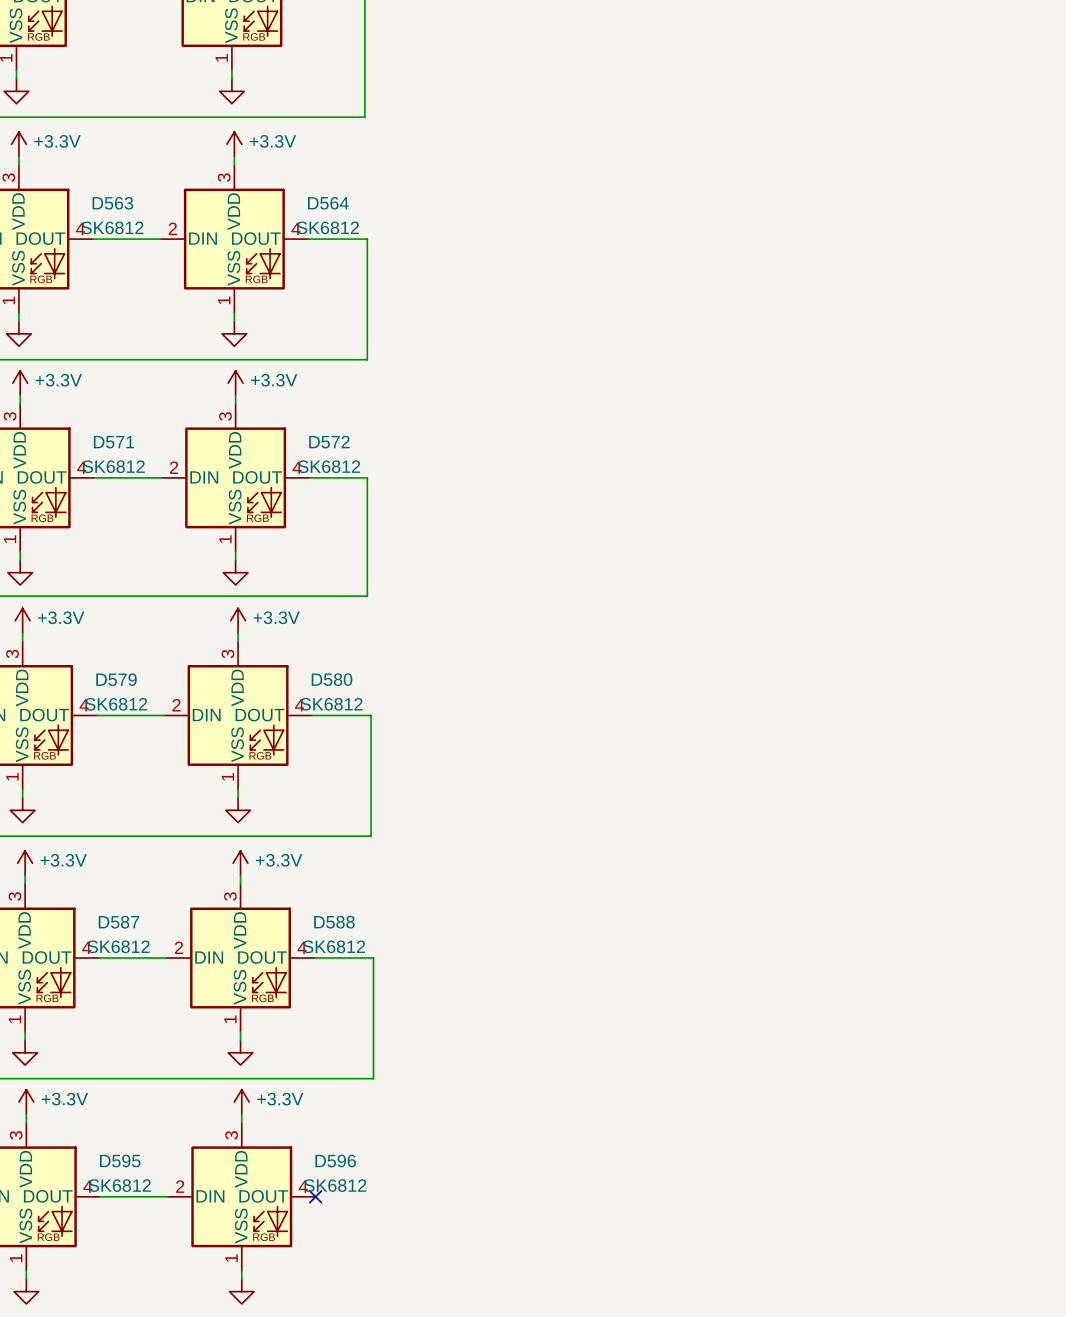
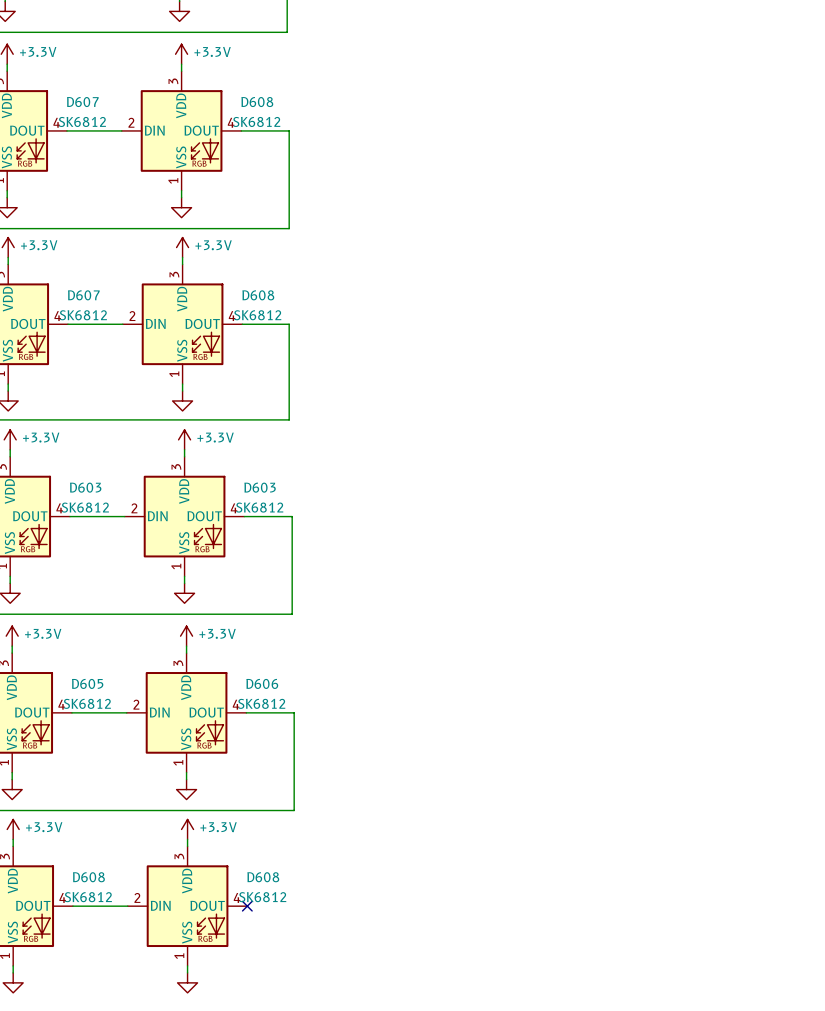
D563 name: D563 (112, 203) -> D607 (82, 102)
D564 name: D564 (328, 203) -> D608 (257, 102)
D571 name: D571 (114, 442) -> D607 (83, 295)
D572 name: D572 (329, 442) -> D608 (258, 295)
D579 name: D579 (116, 679) -> D603 (85, 487)
D580 name: D580 (332, 679) -> D603 (260, 487)
D587 name: D587 (118, 922) -> D605 (87, 683)
D588 name: D588 (334, 922) -> D606 (262, 683)
D595 name: D595 (120, 1161) -> D608 (88, 877)
D596 name: D596 (335, 1161) -> D608 (263, 877)

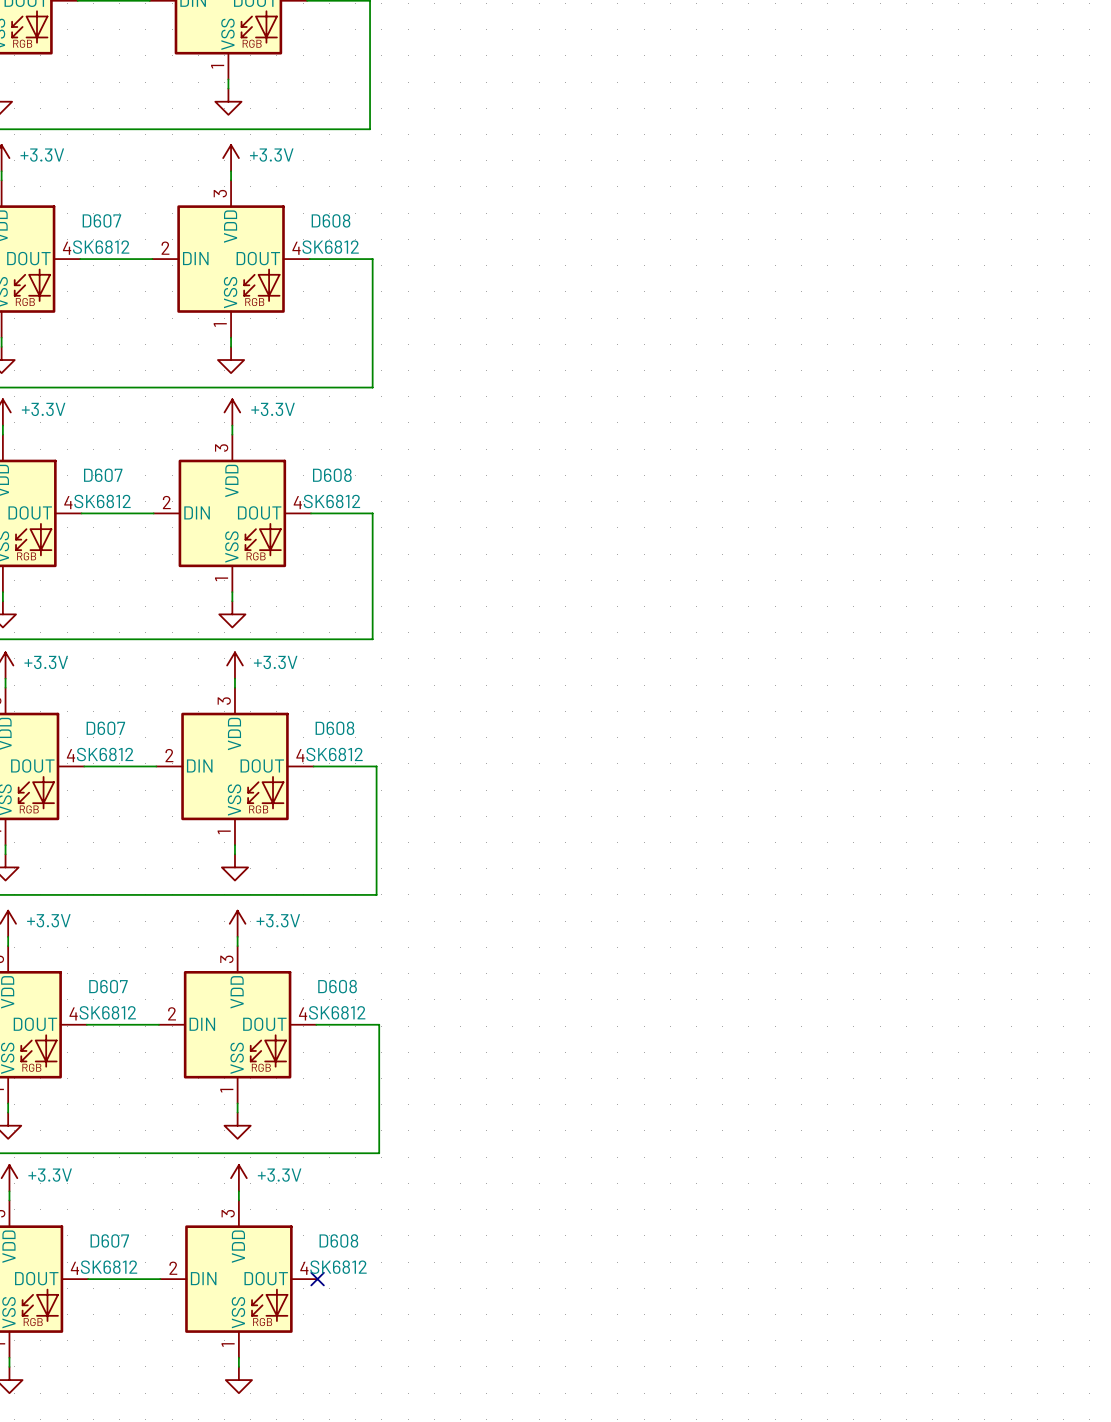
D603 name: D603 (85, 487) -> D607 (105, 728)
D603 name: D603 (260, 487) -> D608 (334, 728)
D605 name: D605 (87, 683) -> D607 (108, 986)
D606 name: D606 (262, 683) -> D608 (337, 986)
D608 name: D608 (88, 877) -> D607 (109, 1240)

